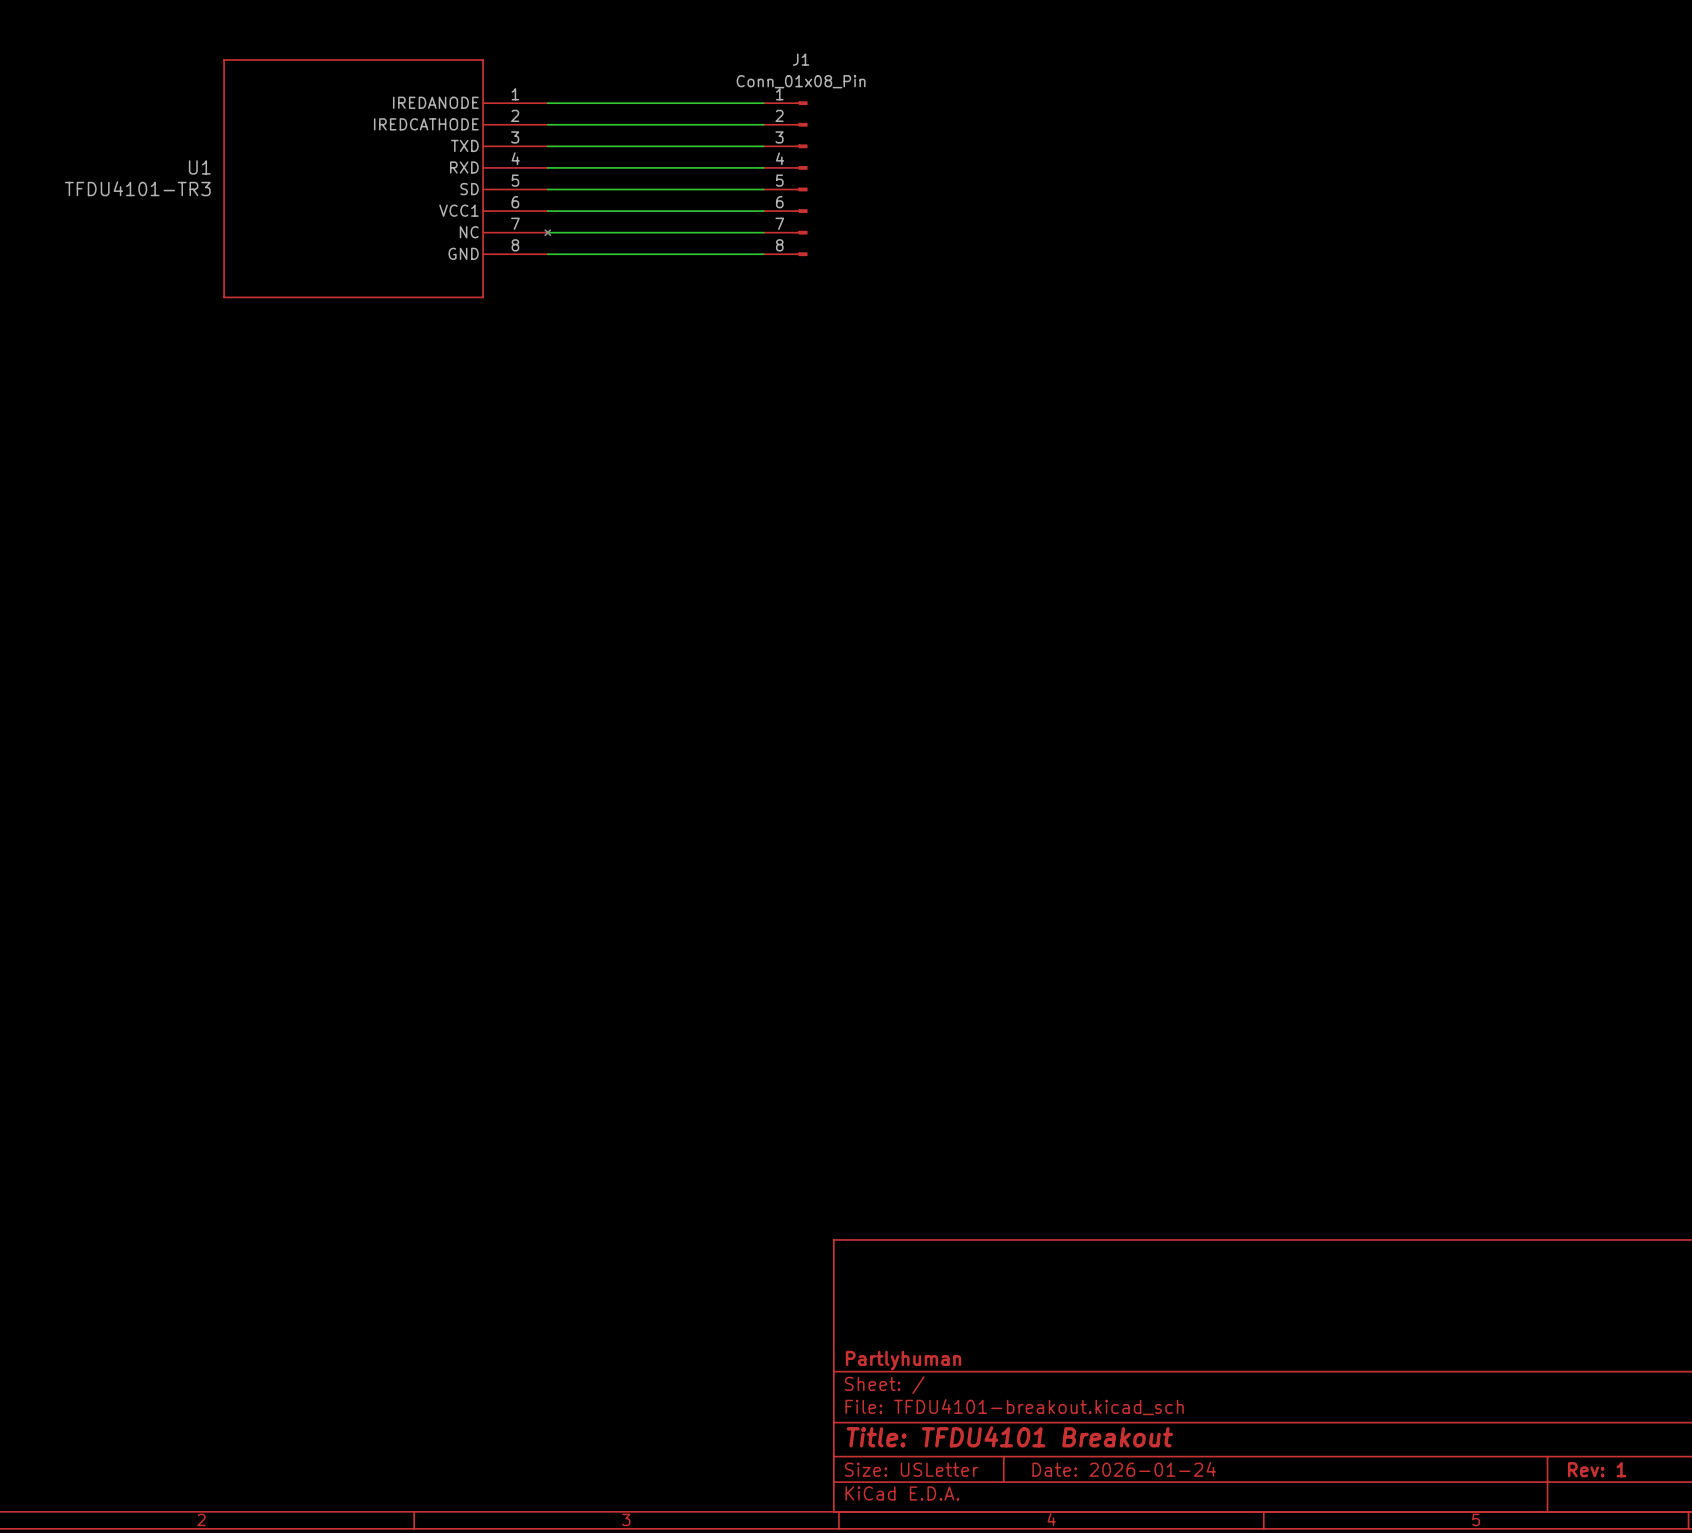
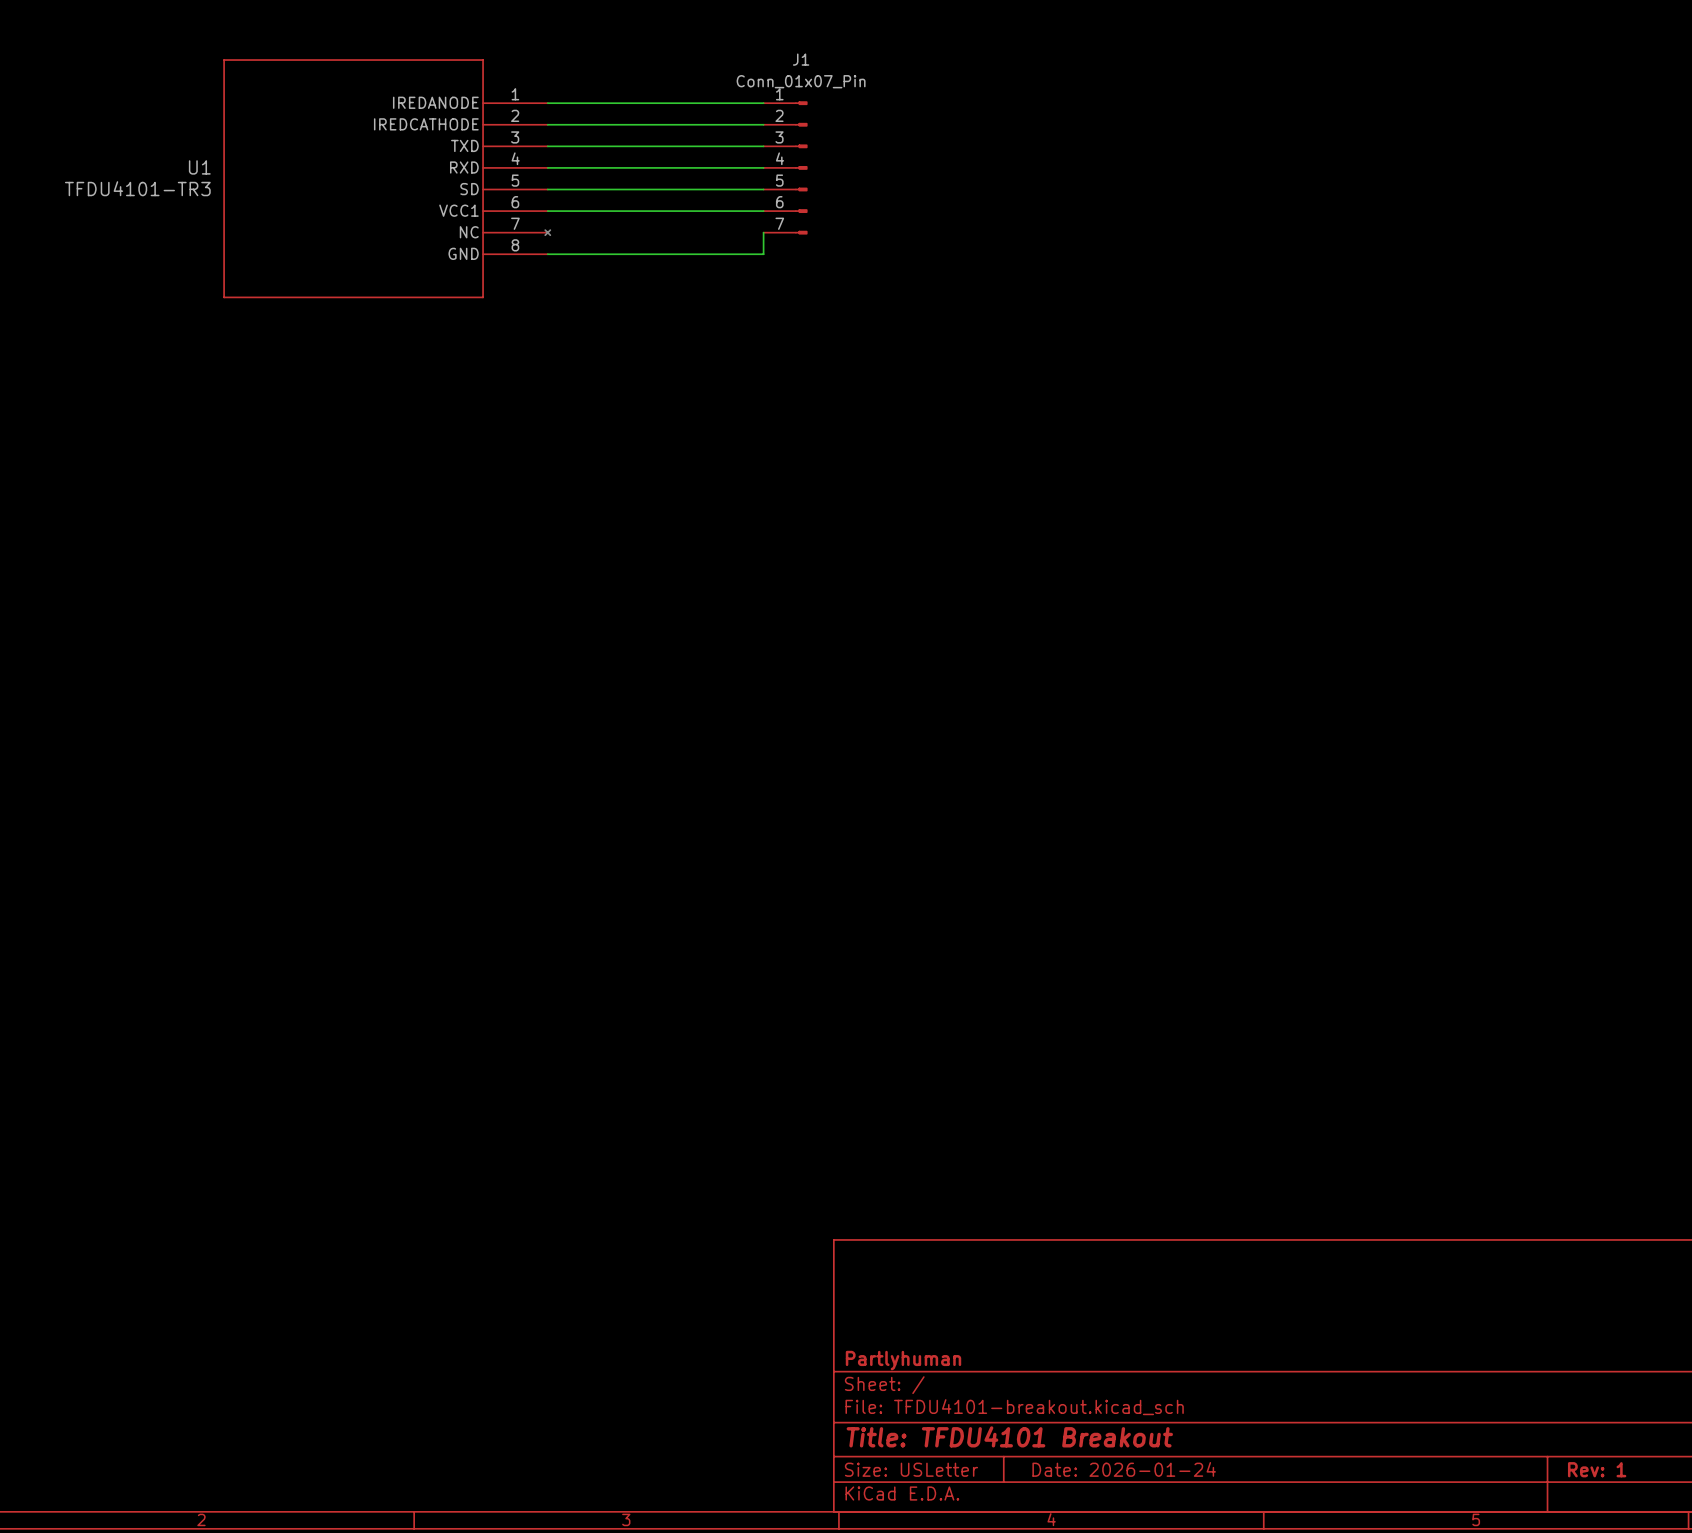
J1 value: Conn_01x08_Pin (801, 81) -> Conn_01x07_Pin (801, 81)
J1 symbol: [763, 101, 808, 256] -> [763, 101, 808, 235]
wire: (547, 232) (763, 232) -> (763, 254) (763, 232)

